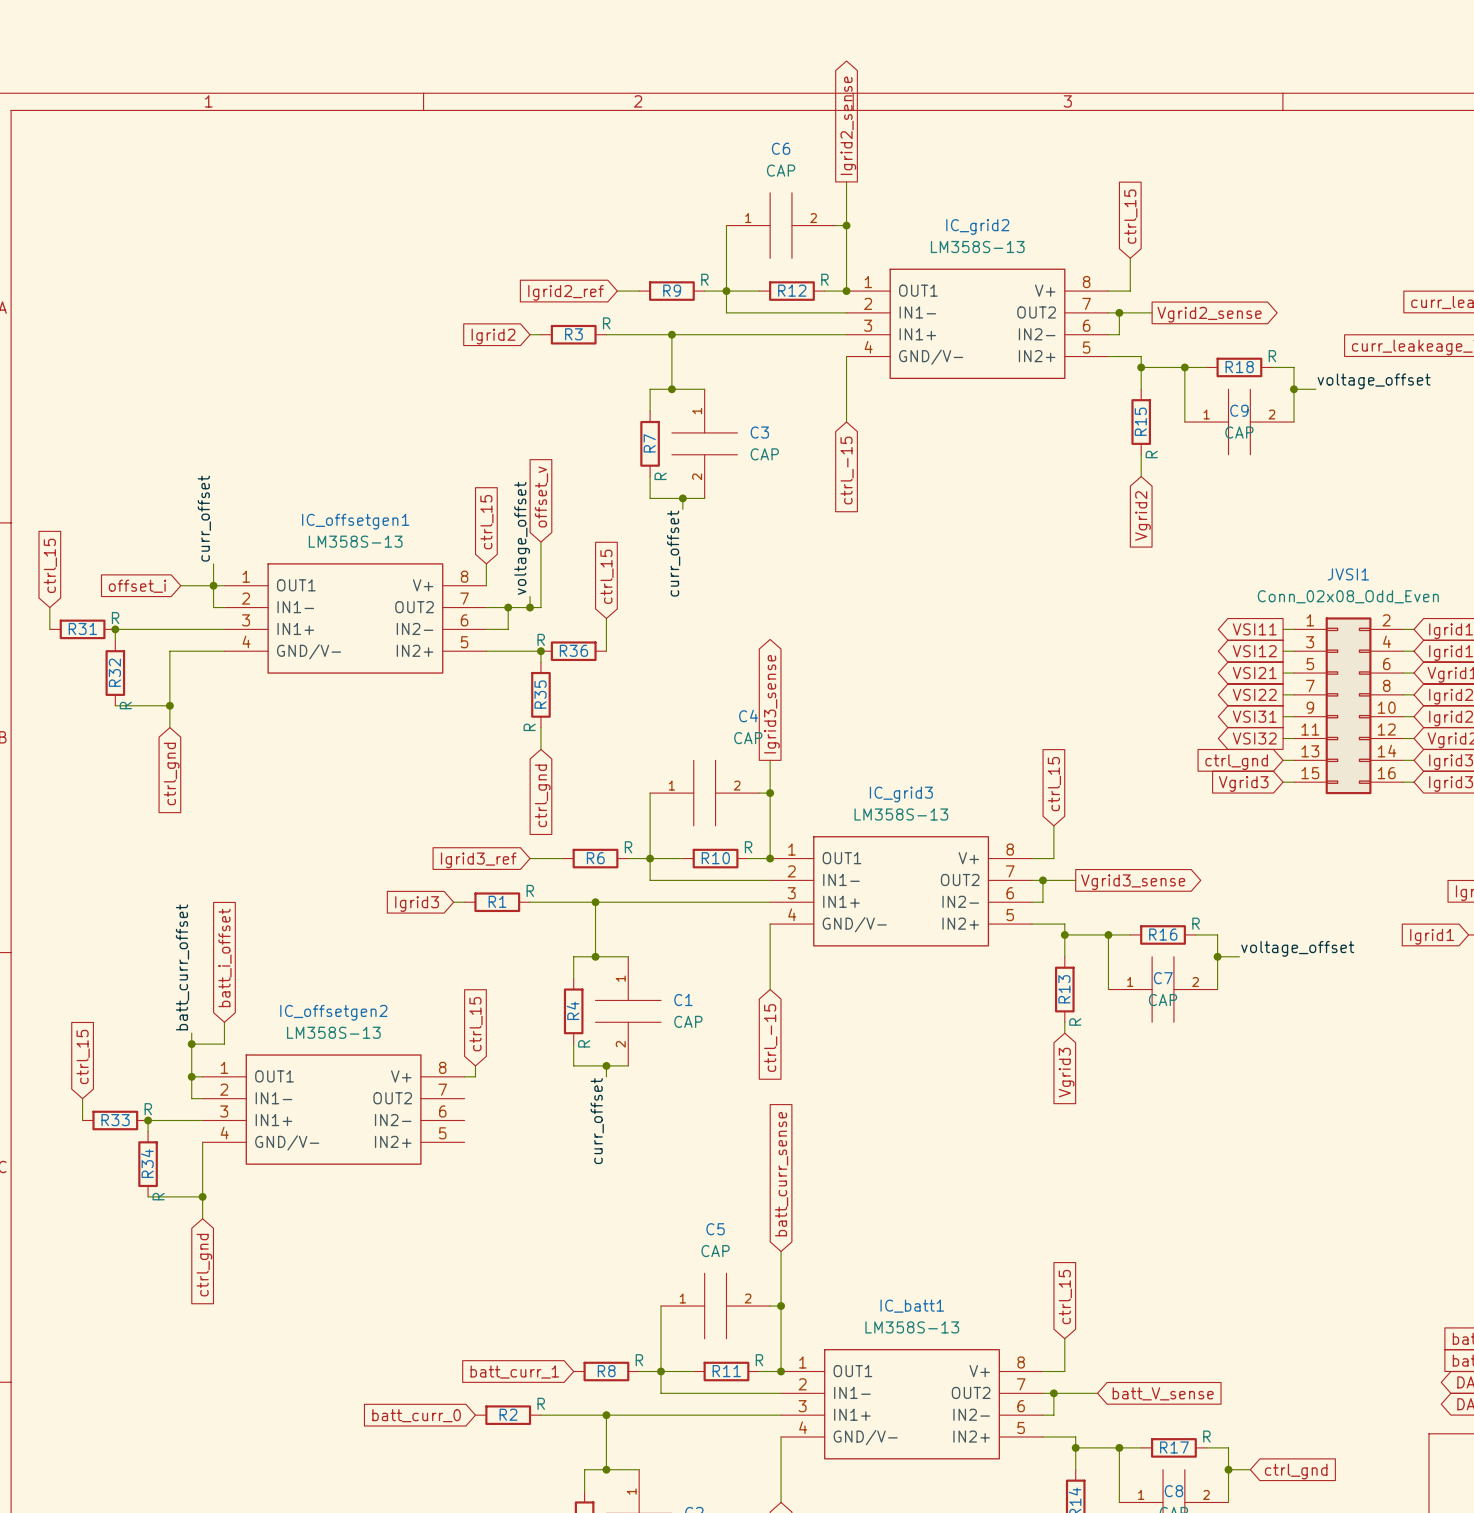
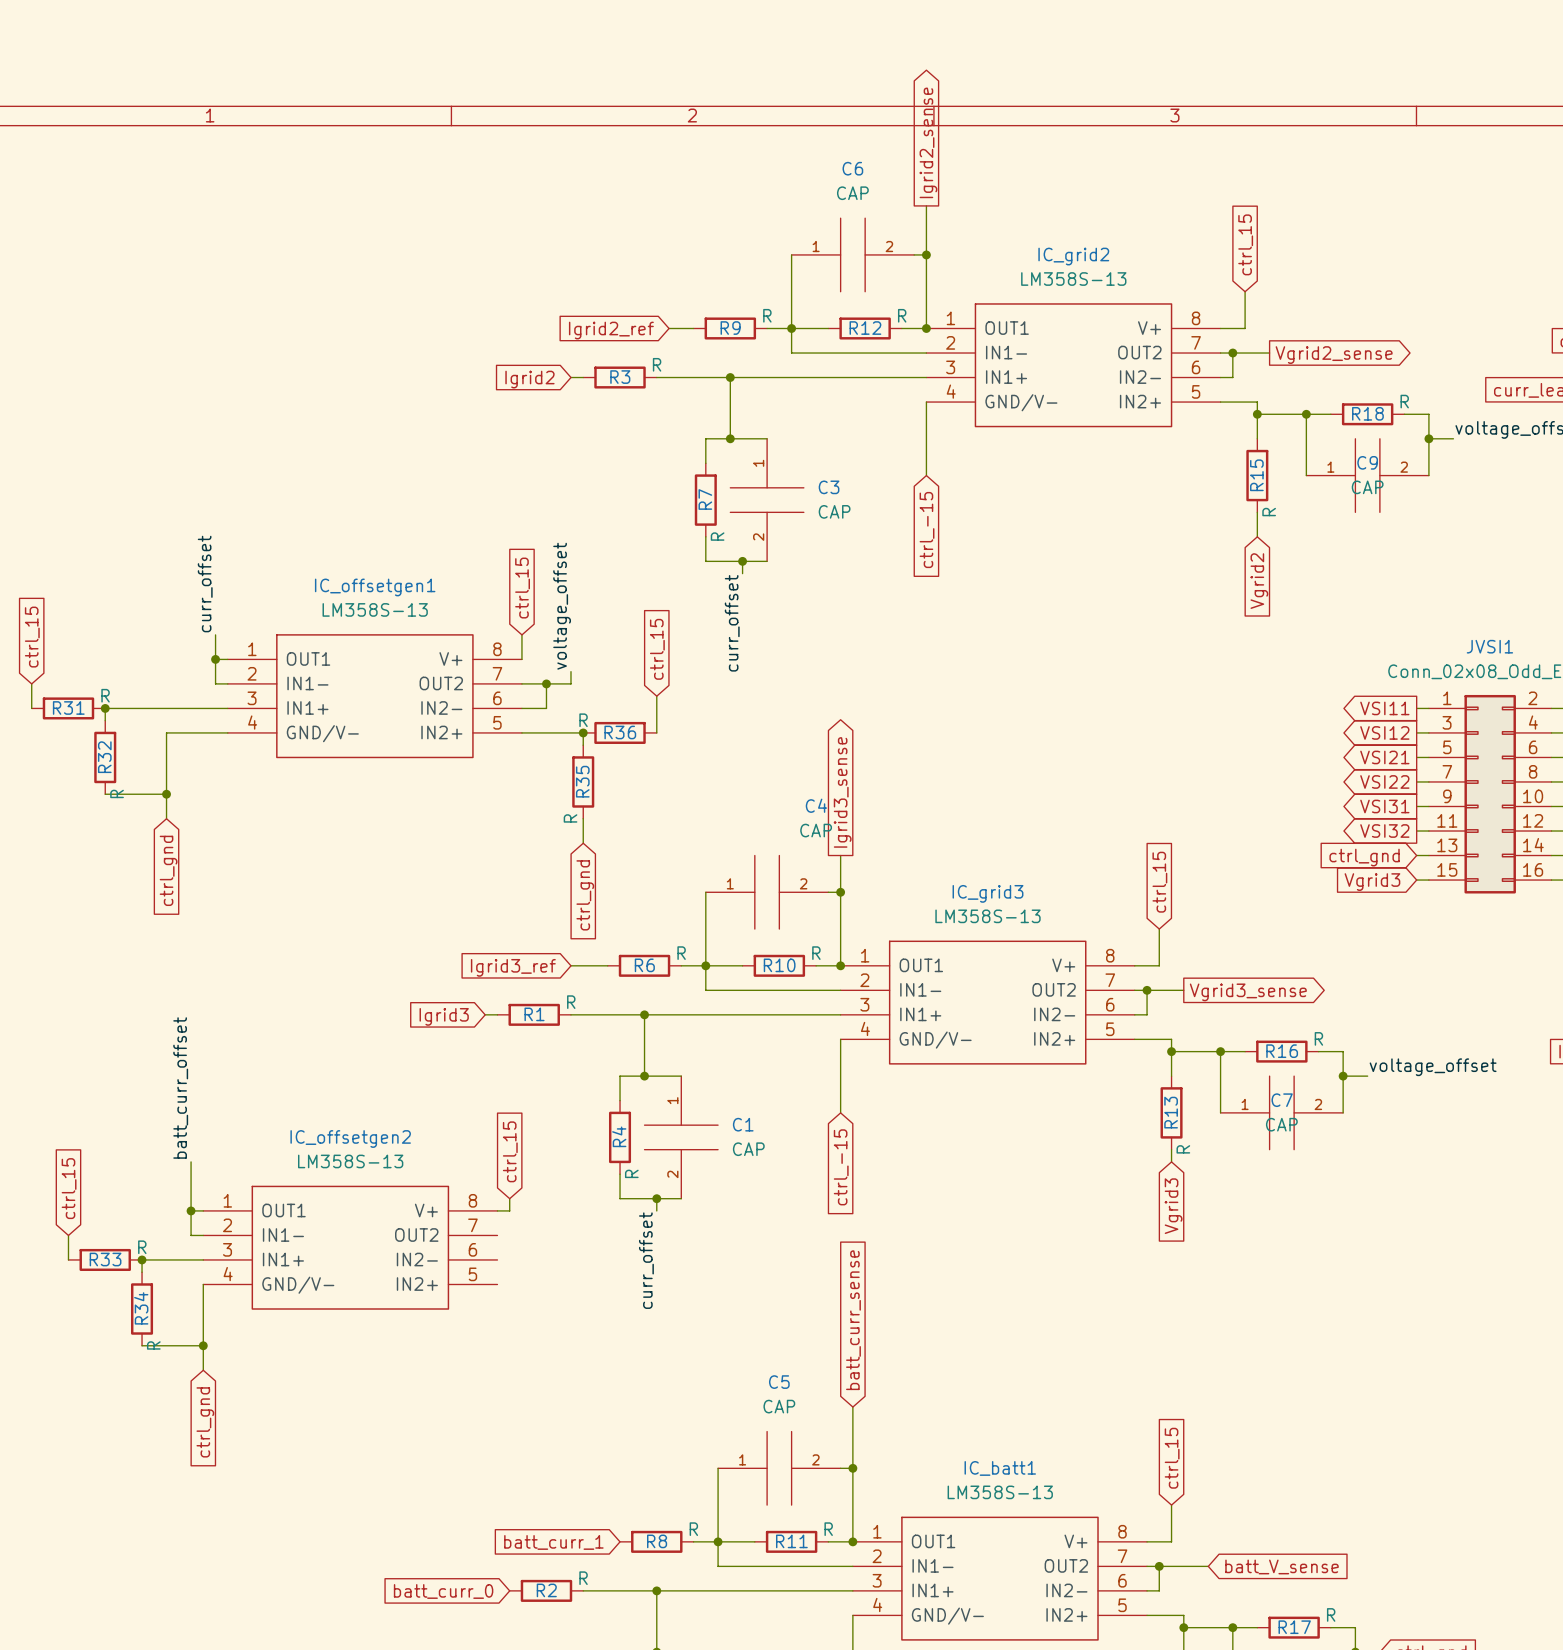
global label: offset_v (541, 496) -> none
wire: (540, 542) (540, 607) (530, 607) -> none
wire: (180, 585) (213, 585) -> none
global label: offset_i (137, 586) -> none
junction: (530, 607) -> none
global label: batt_i_offset (224, 957) -> none
wire: (224, 1022) (224, 1044) (191, 1044) -> none
junction: (191, 1044) -> none

